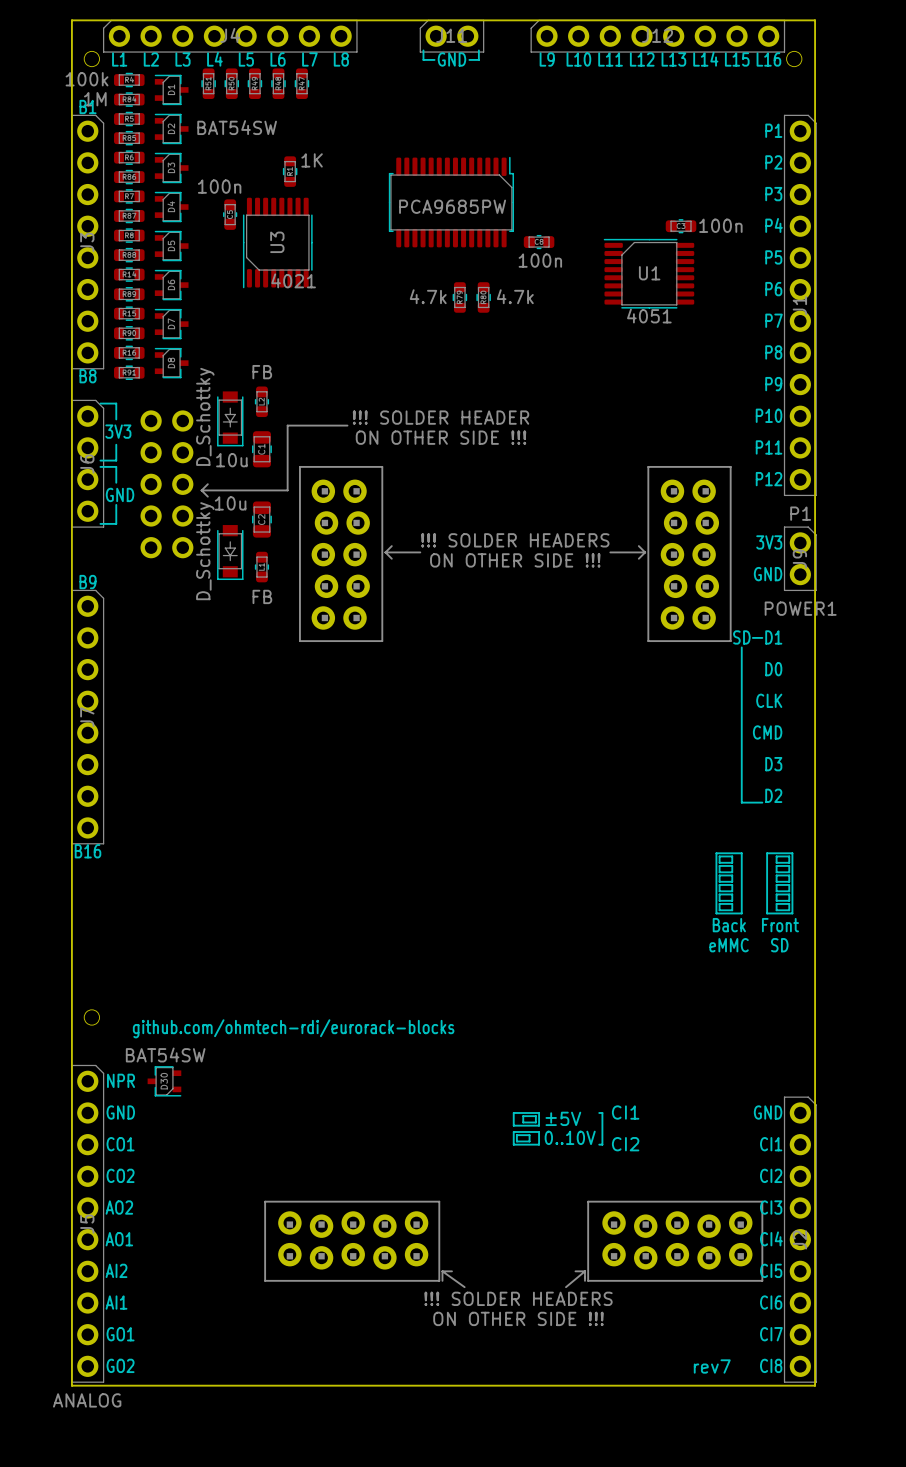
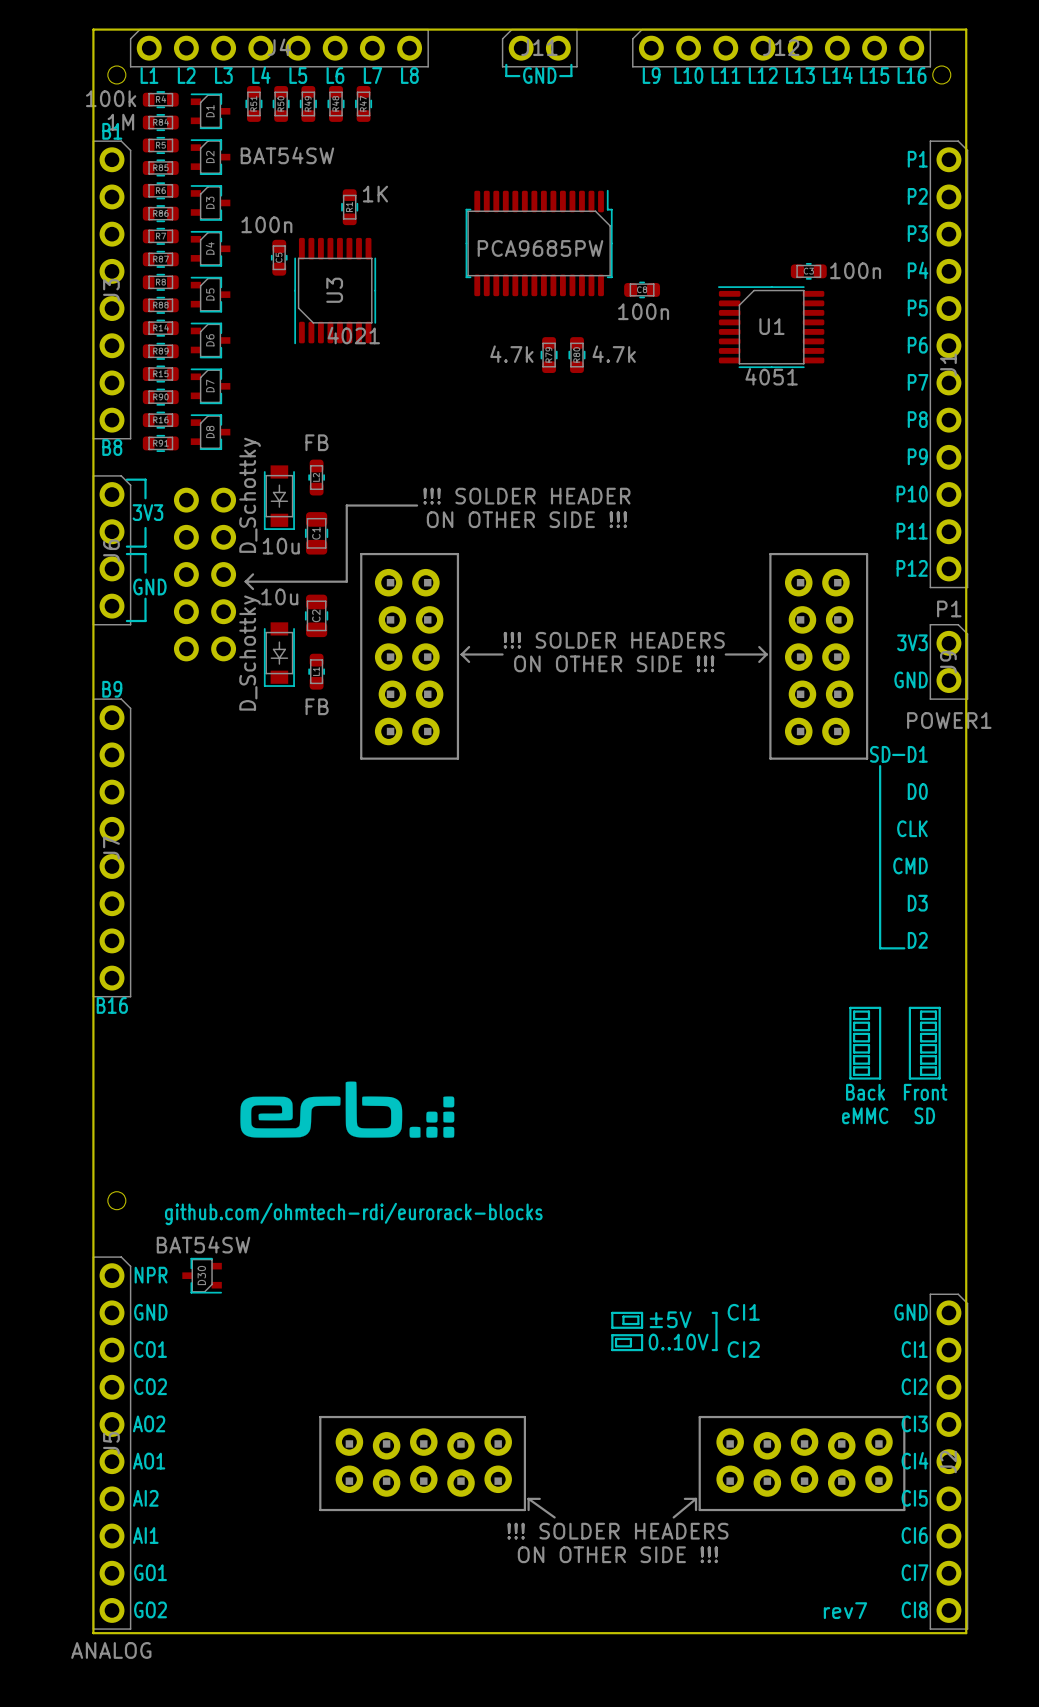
drawing: none -> [240, 1081, 455, 1138]

